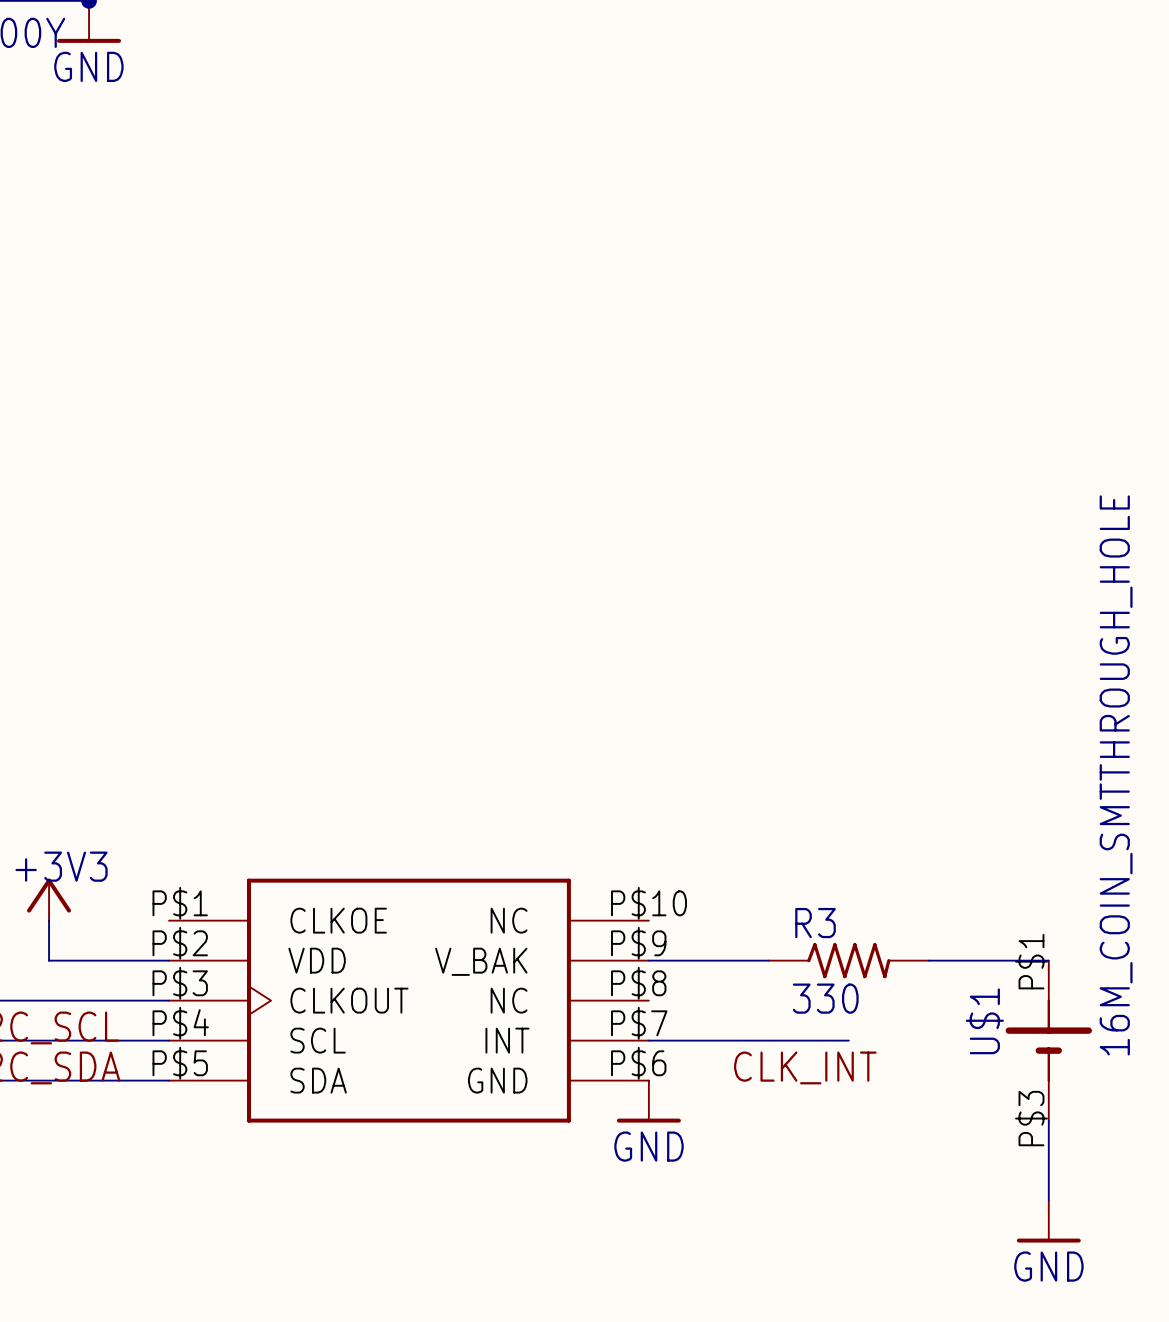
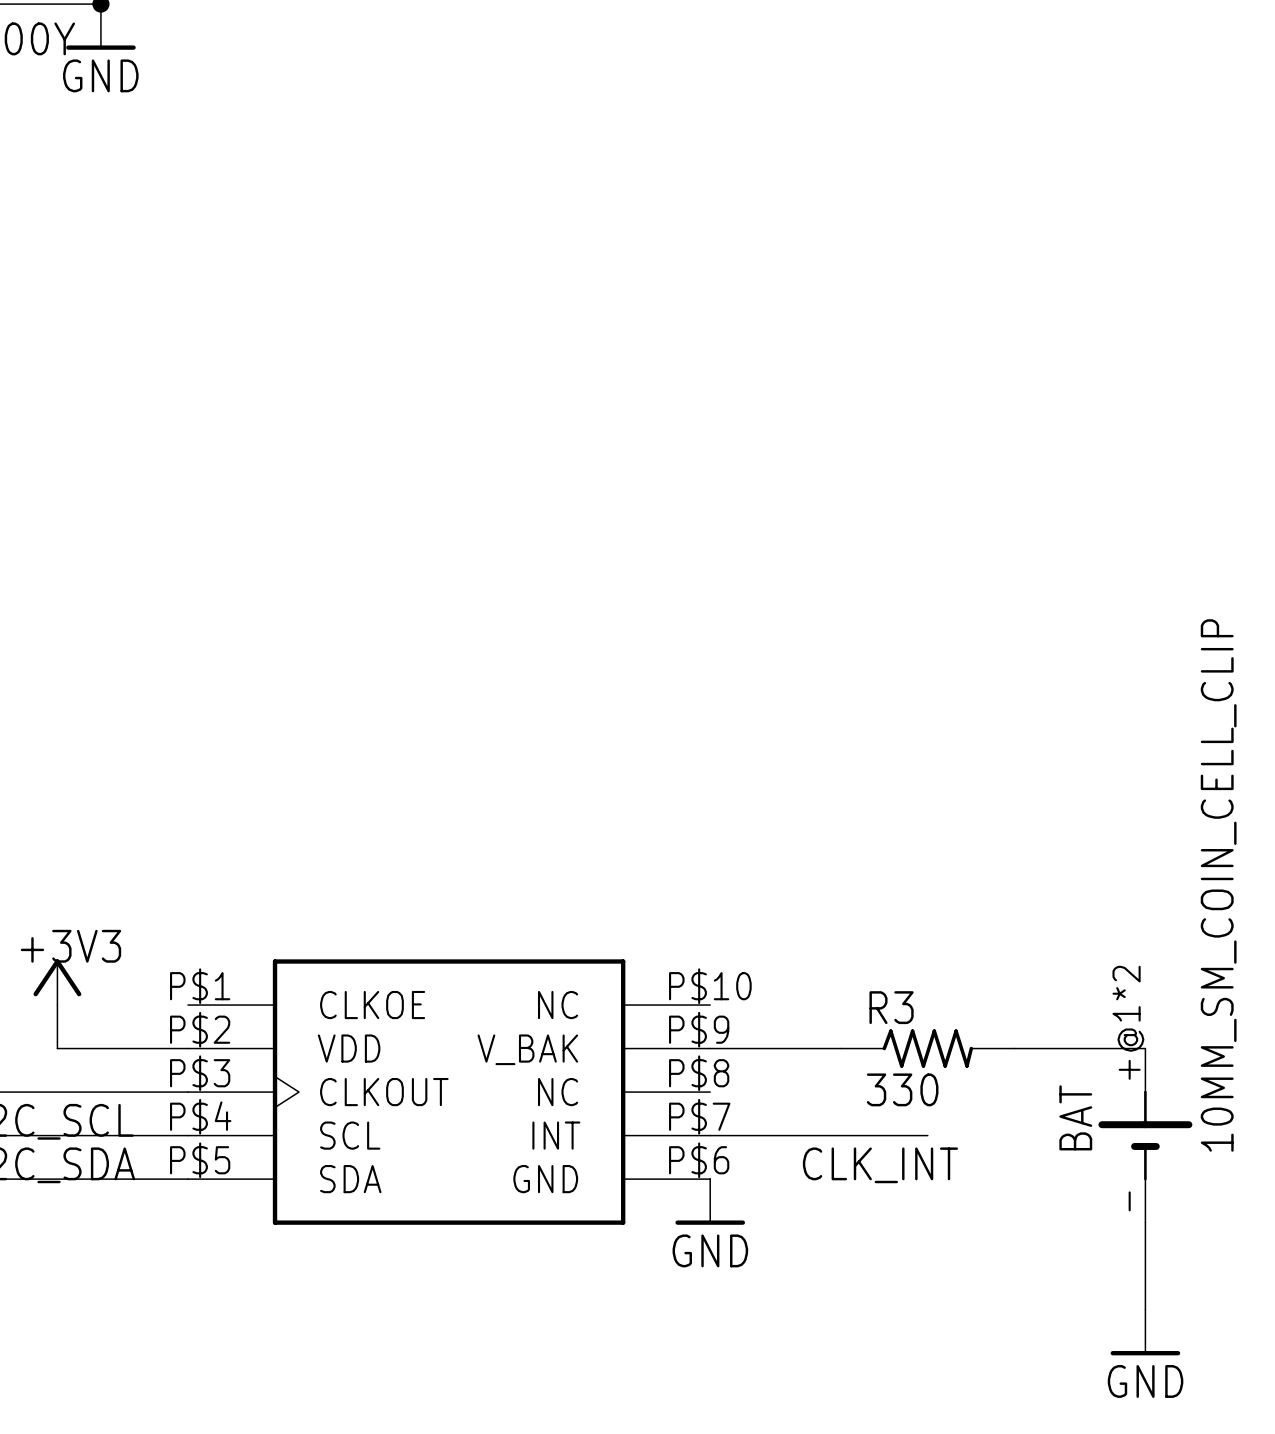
U$1 value: 16M_COIN_SMTTHROUGH_HOLE (1116, 775) -> 10MM_SM_COIN_CELL_CLIP (1218, 885)
U$1 pin number: P$1 (1031, 961) -> +@1*2 (1128, 1022)
U$1 name: U$1 (984, 1021) -> BAT (1075, 1117)
U$1 pin number: P$3 (1031, 1118) -> - (1129, 1201)

